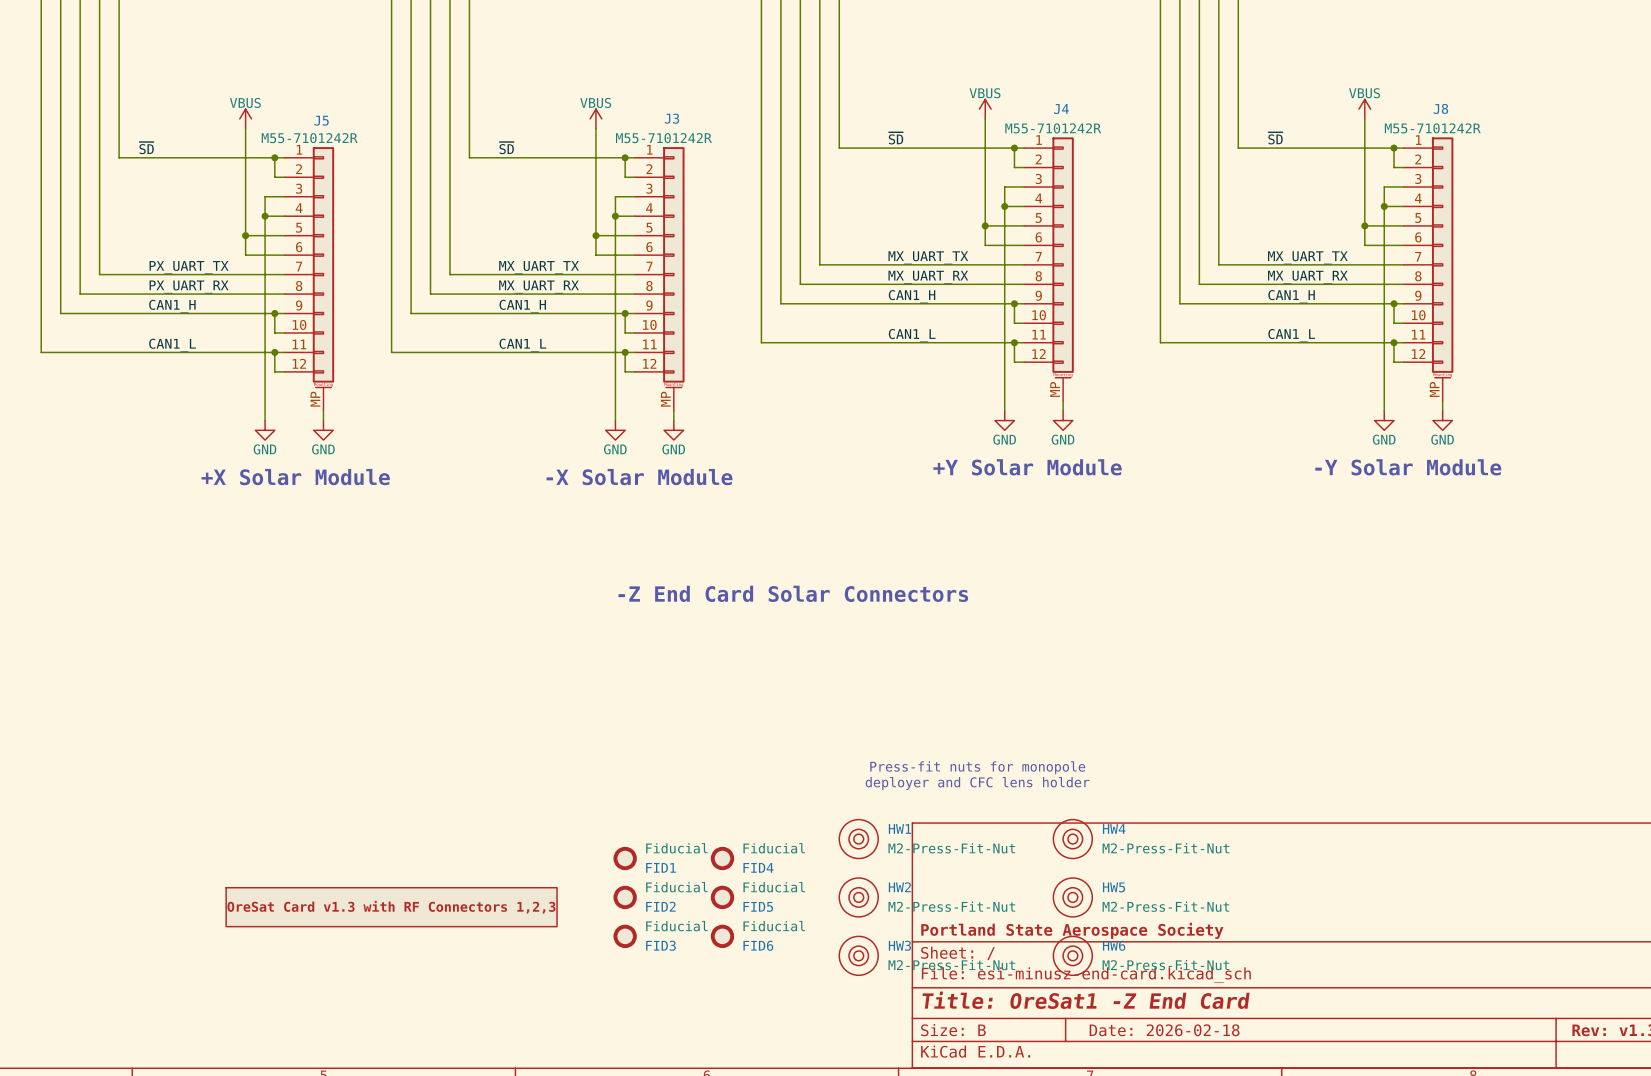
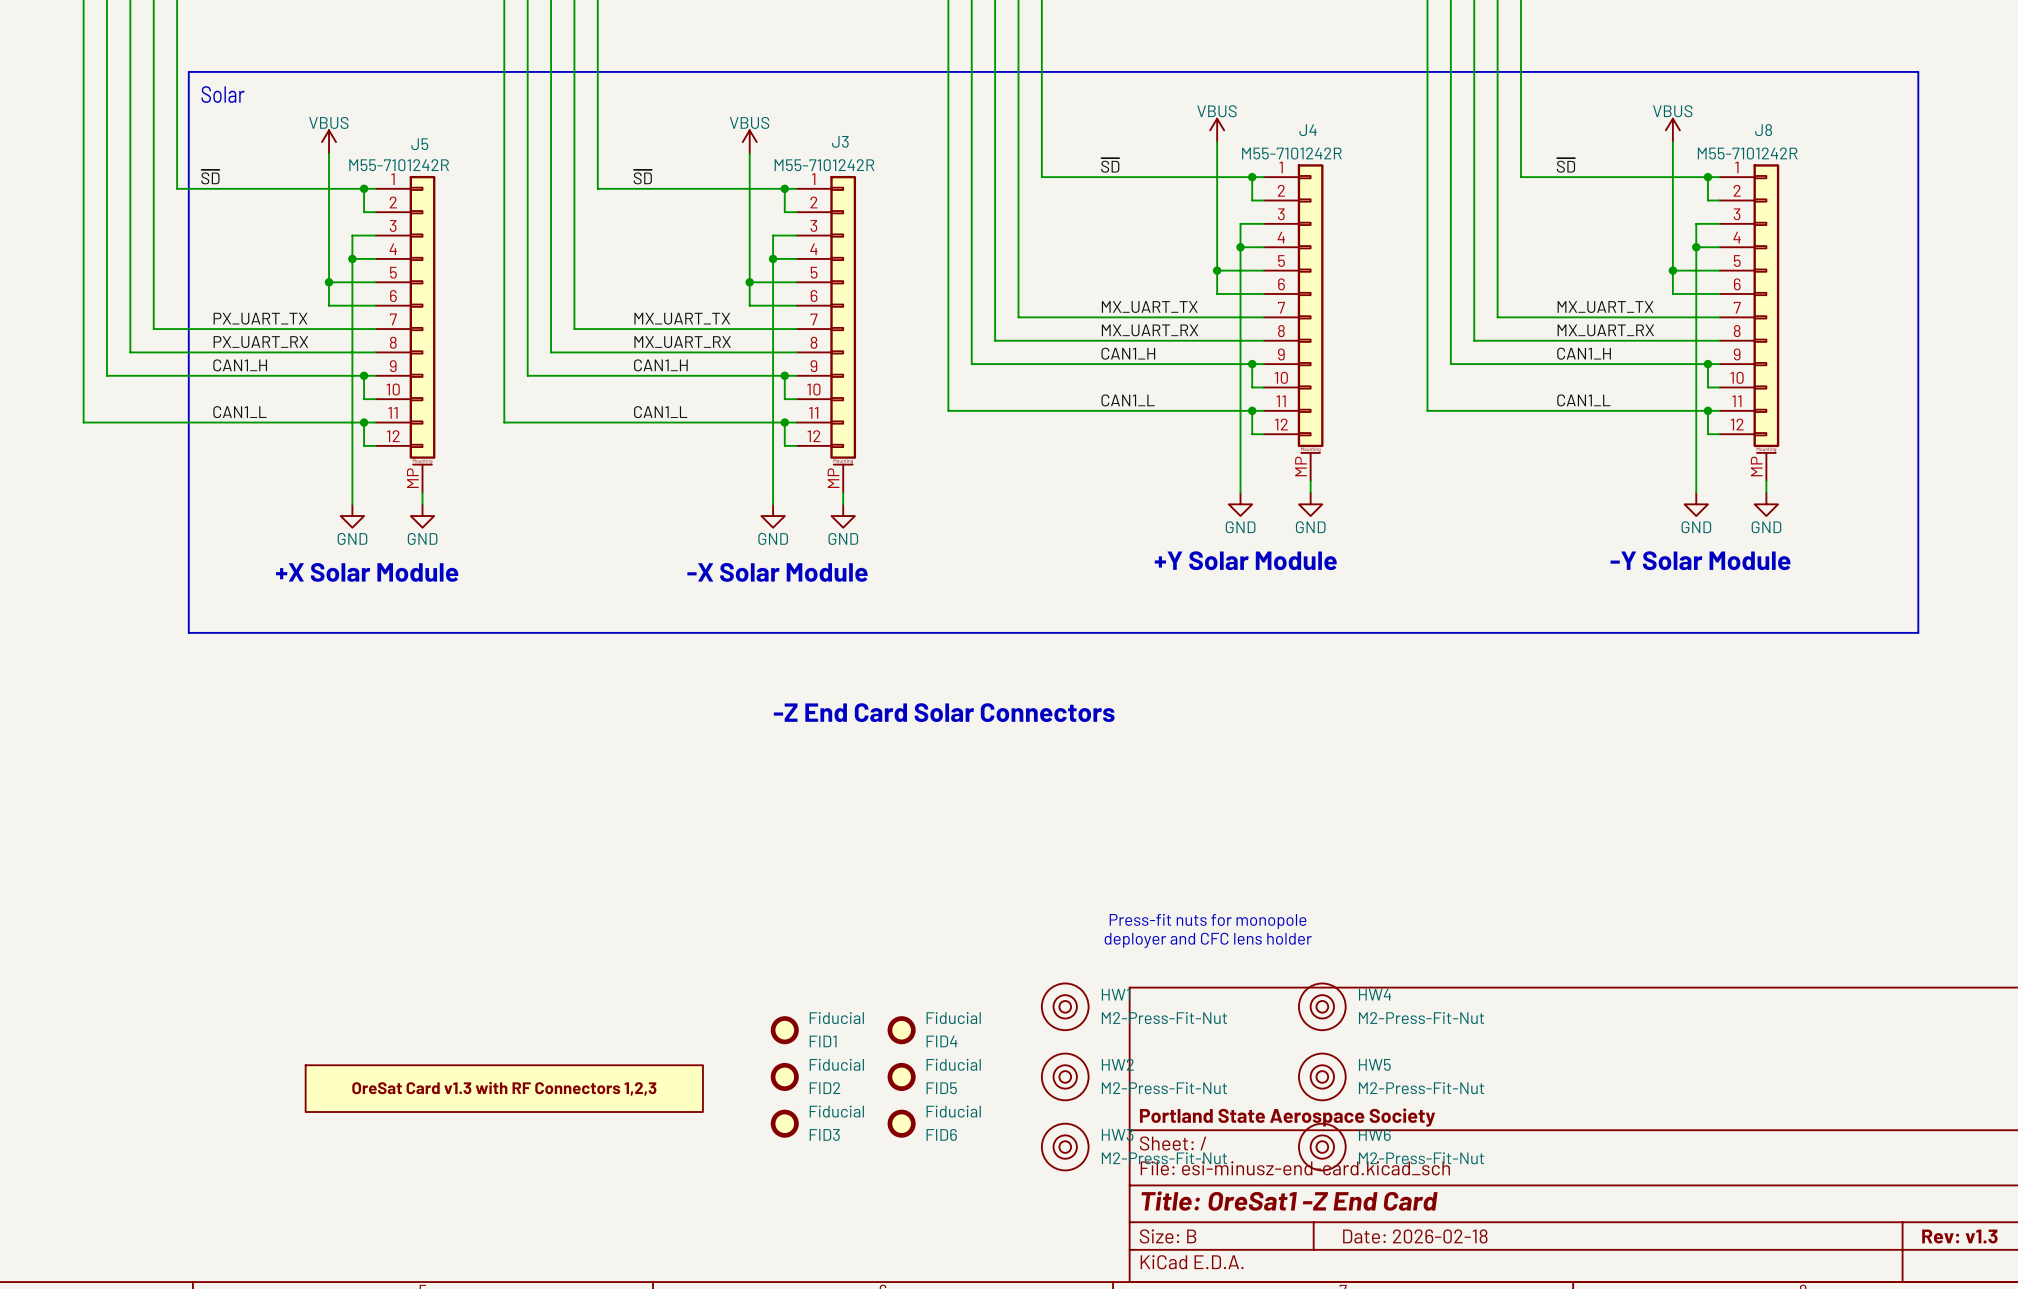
line: none -> (188, 71) (188, 632) (1918, 632) (1918, 71) (188, 71)
text: none -> Solar (223, 94)

